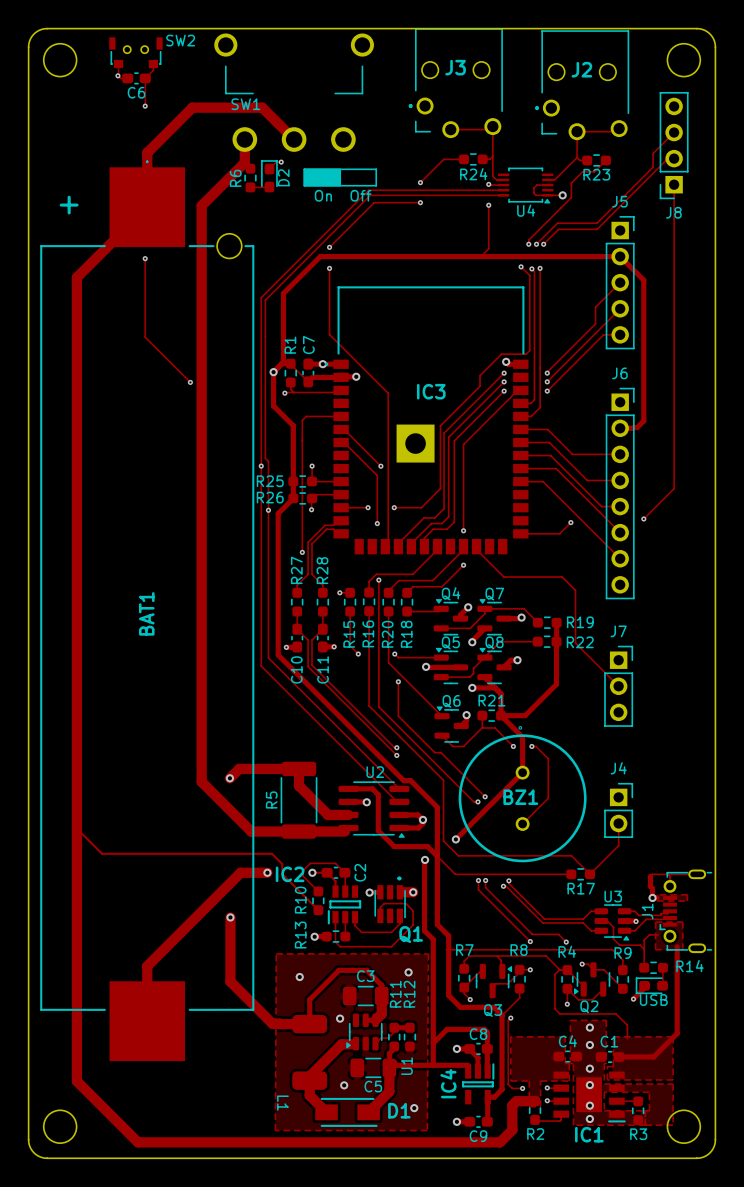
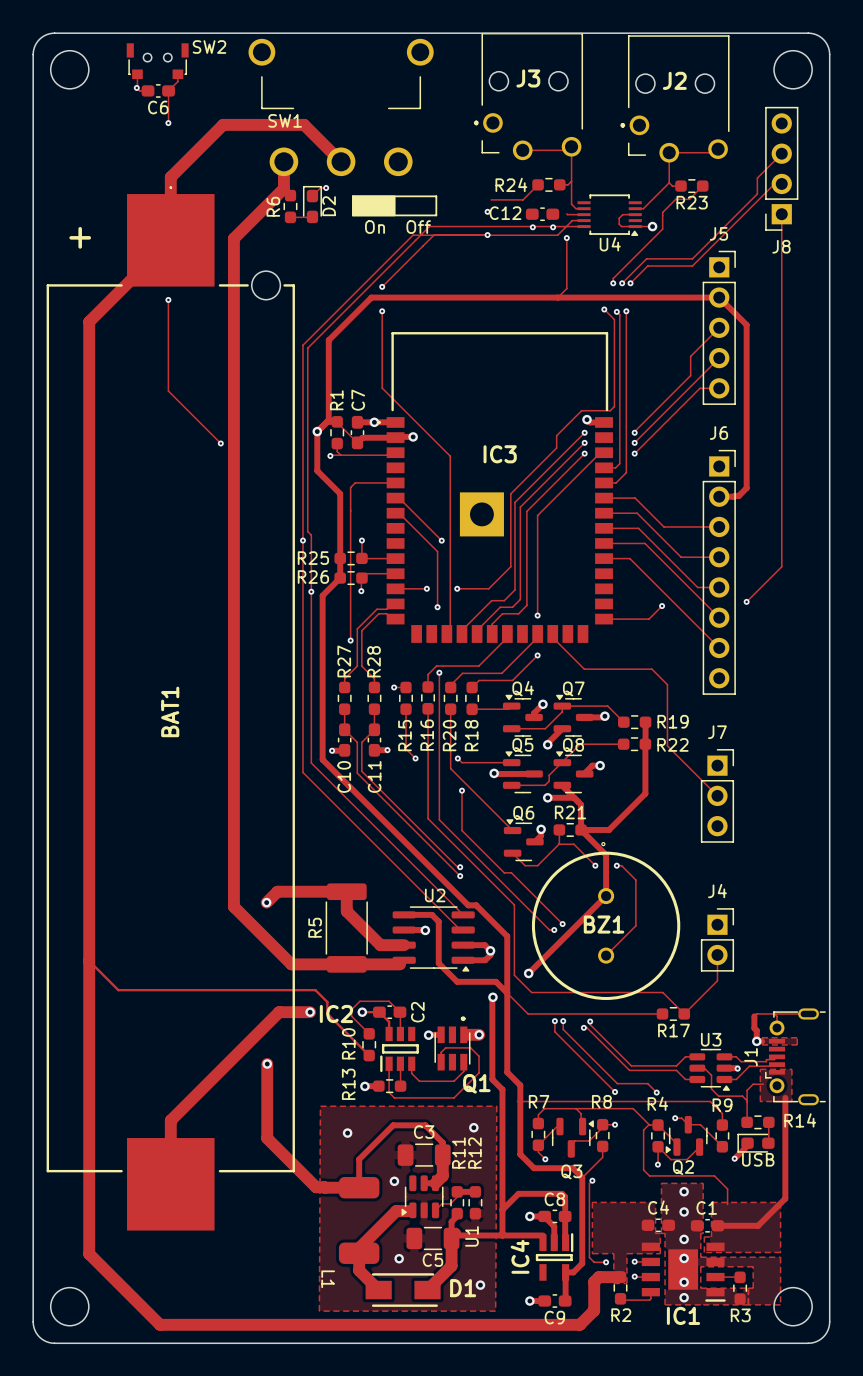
track: (463, 159) (443, 159) (420, 182) -> (538, 184) (523, 199) (491, 199)
R24 name position: R24 (473, 174) -> R24 (511, 184)
C12: none -> (542, 214)
via: (488, 184) -> none
track: (493, 190) (368, 190) (356, 202) -> (572, 220) (557, 235) (412, 235)
via: none -> (532, 227)
via: none -> (553, 227)

